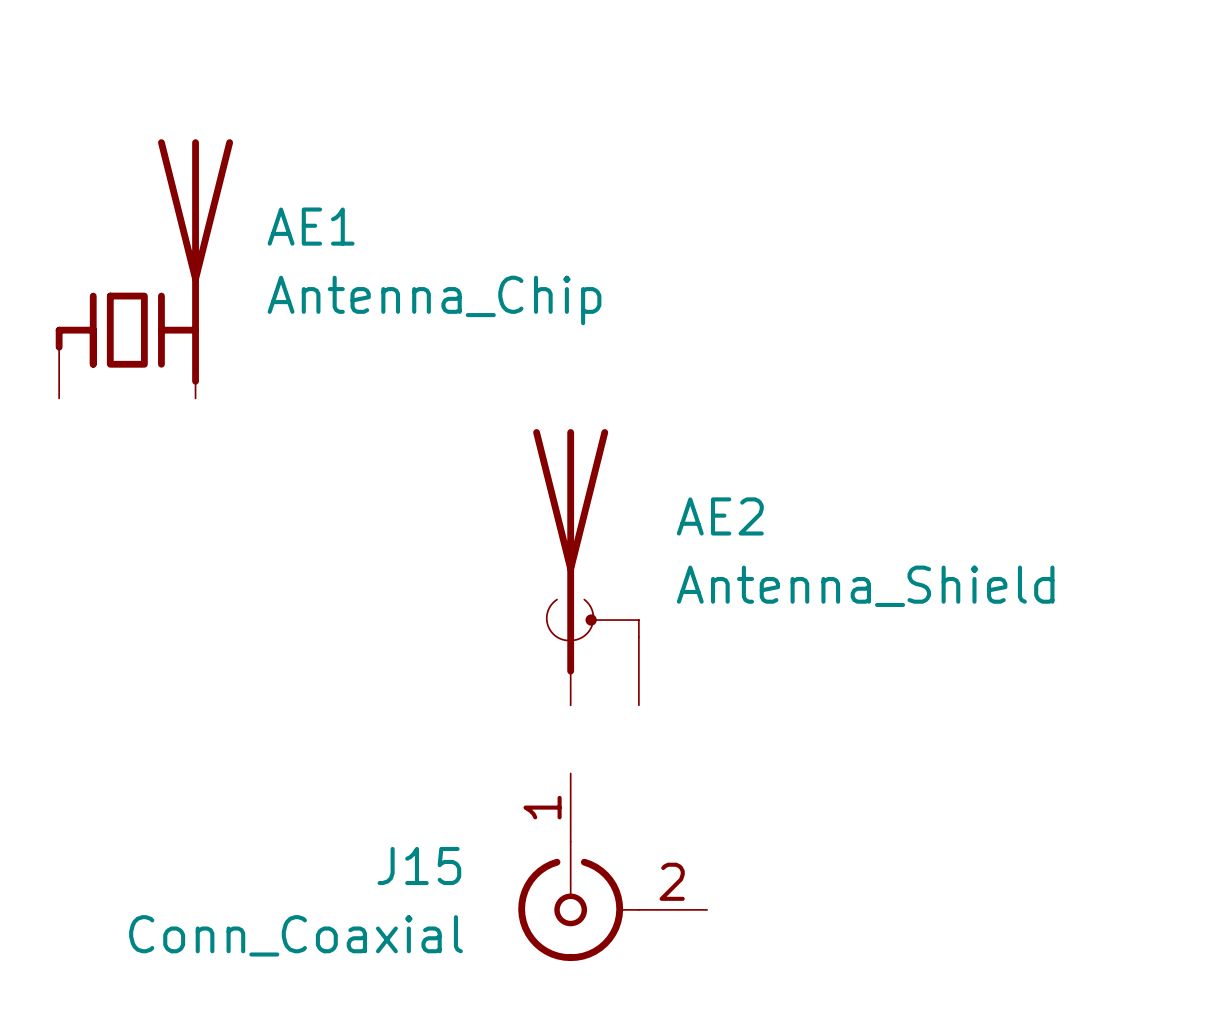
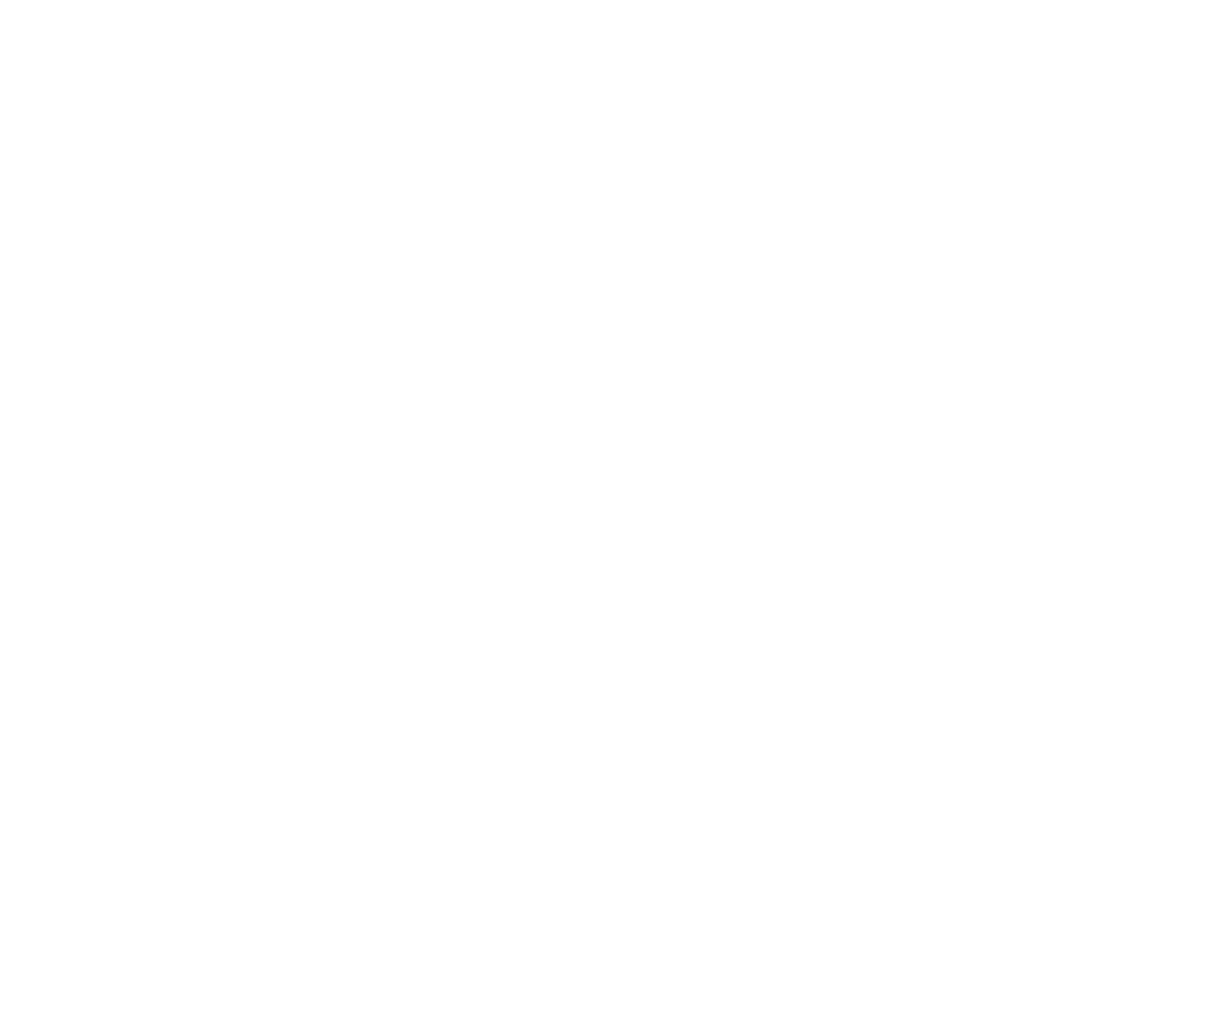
AE1: Antenna_Chip (144, 268) -> none
AE2: Antenna_Shield (586, 567) -> none
J15: Conn_Coaxial (612, 867) -> none

